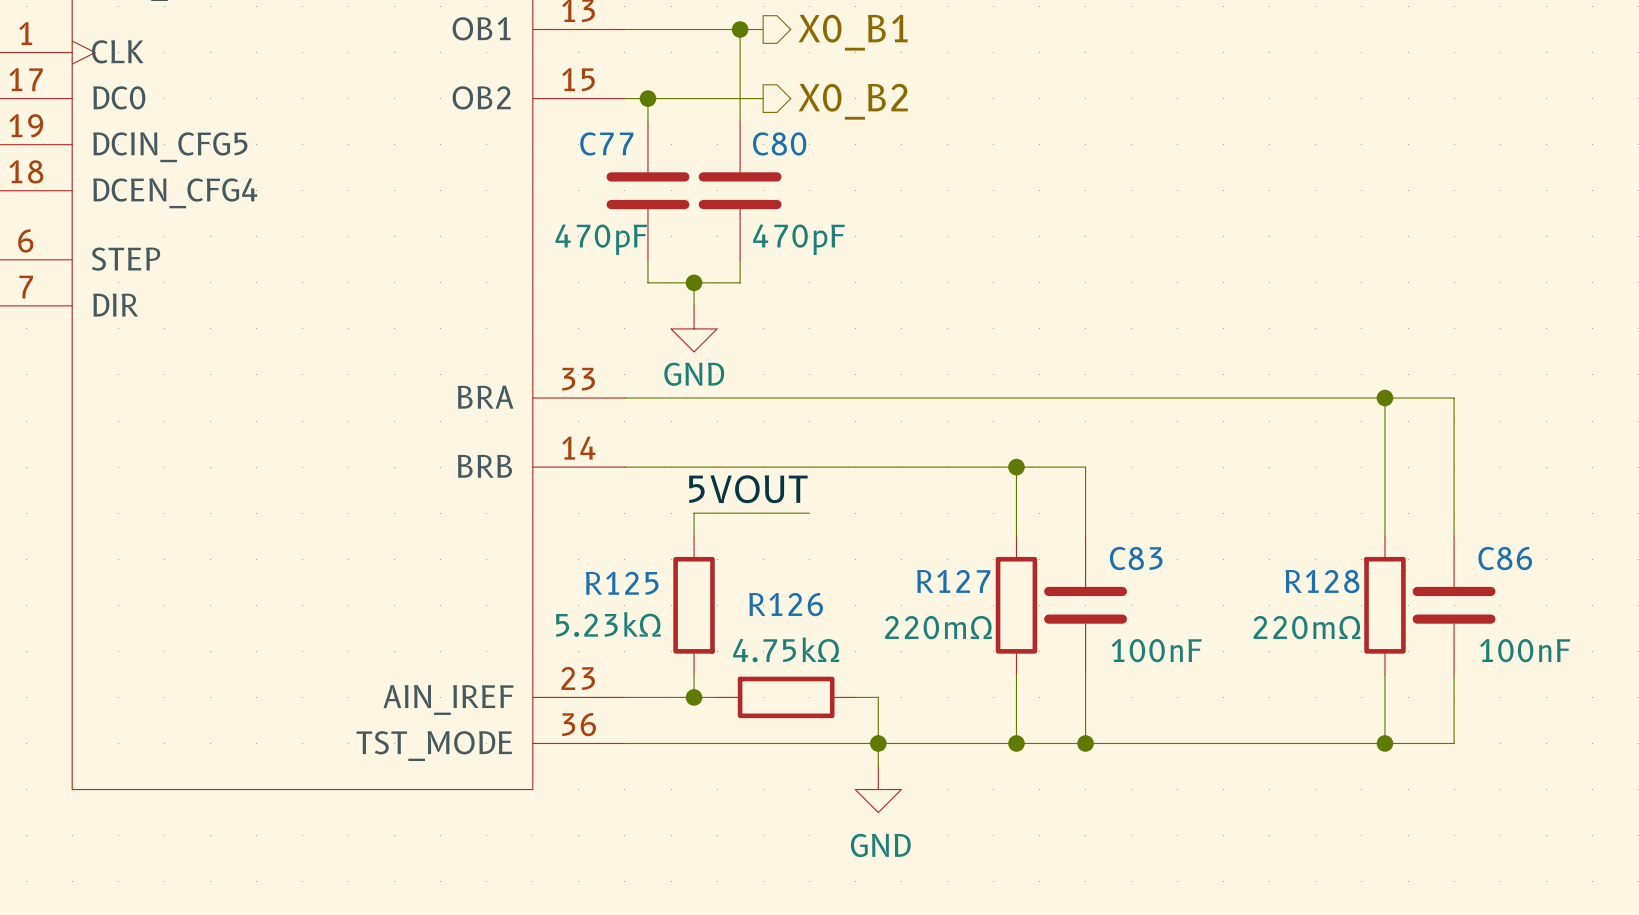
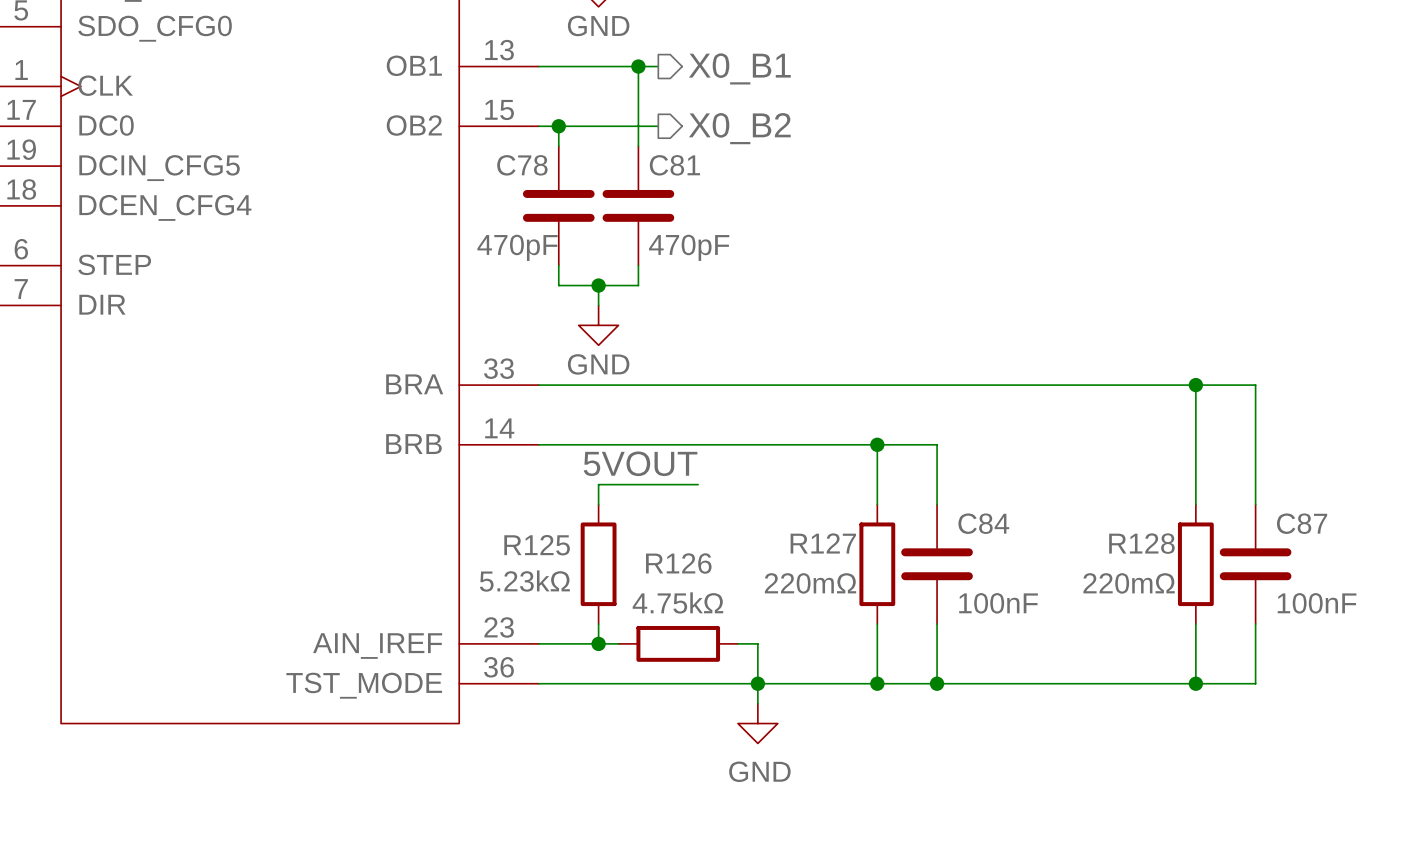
C77 name: C77 (606, 143) -> C78 (522, 165)
C80 name: C80 (779, 143) -> C81 (674, 165)
C83 name: C83 (1136, 558) -> C84 (983, 523)
C86 name: C86 (1505, 558) -> C87 (1302, 523)

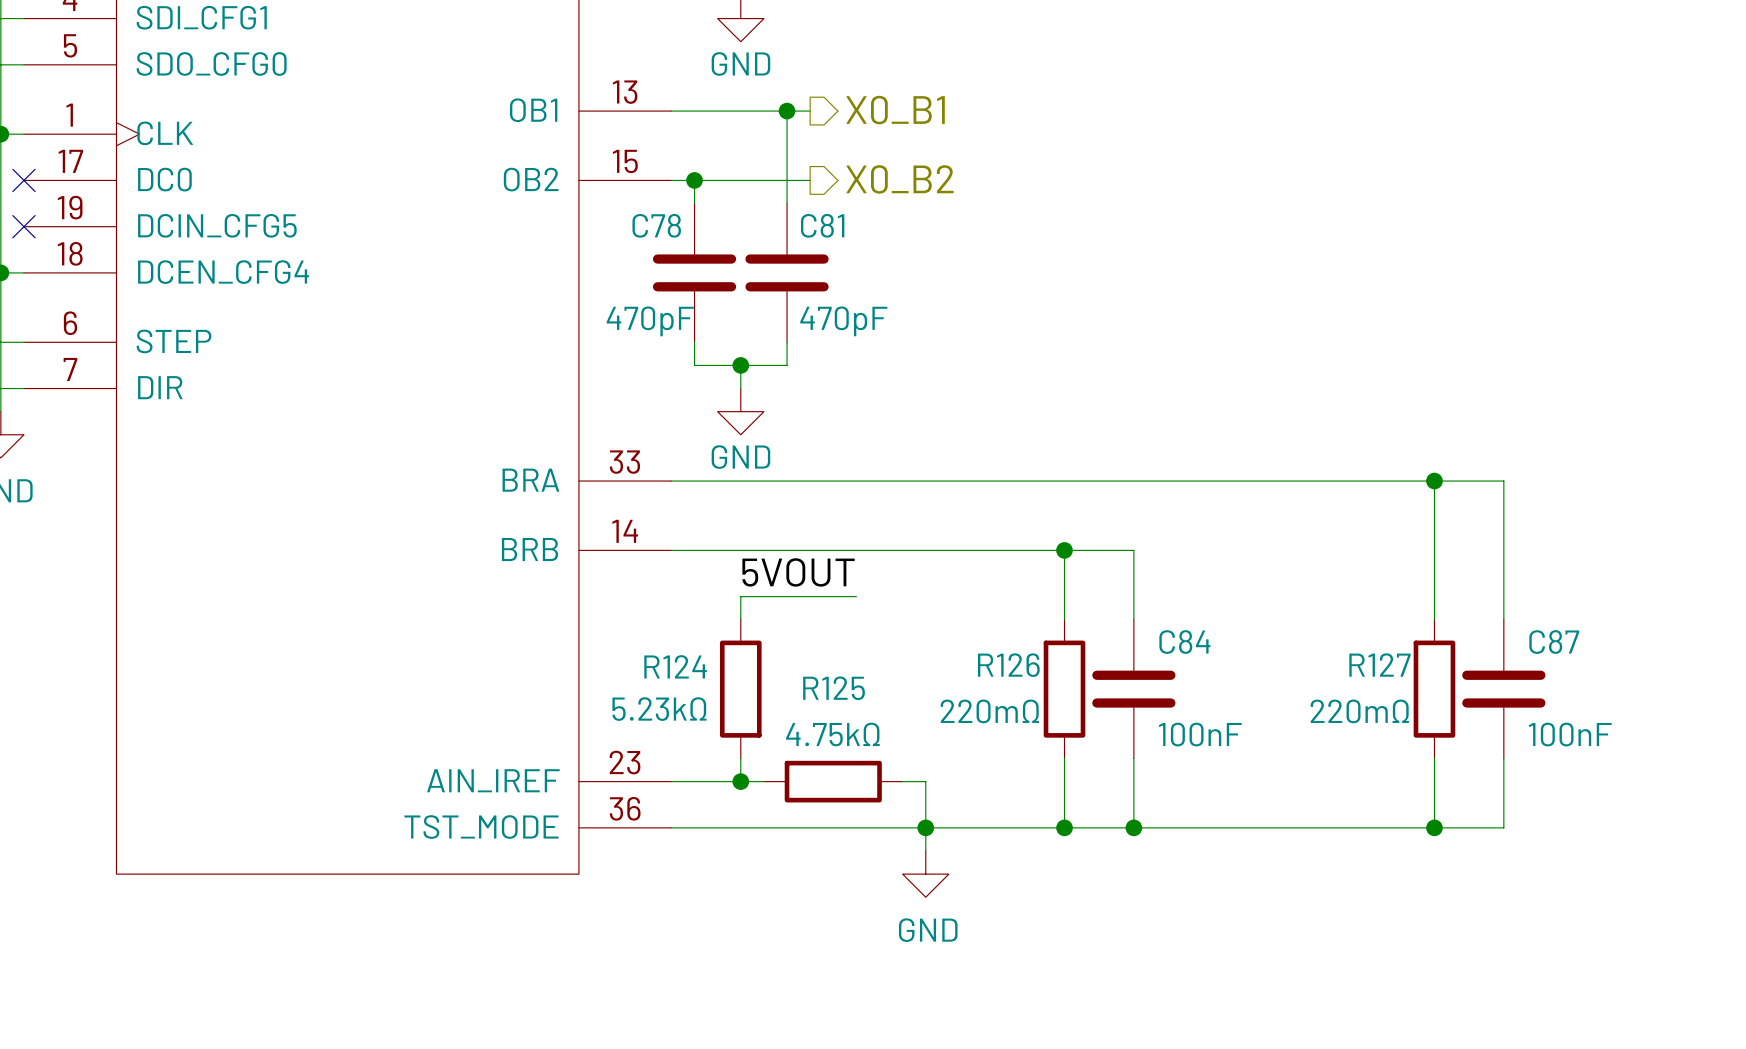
R127 name: R127 (823, 543) -> R126 (1008, 665)
R128 name: R128 (1141, 543) -> R127 (1379, 665)
R125 name: R125 (537, 545) -> R124 (675, 666)
R126 name: R126 (678, 563) -> R125 (834, 688)

